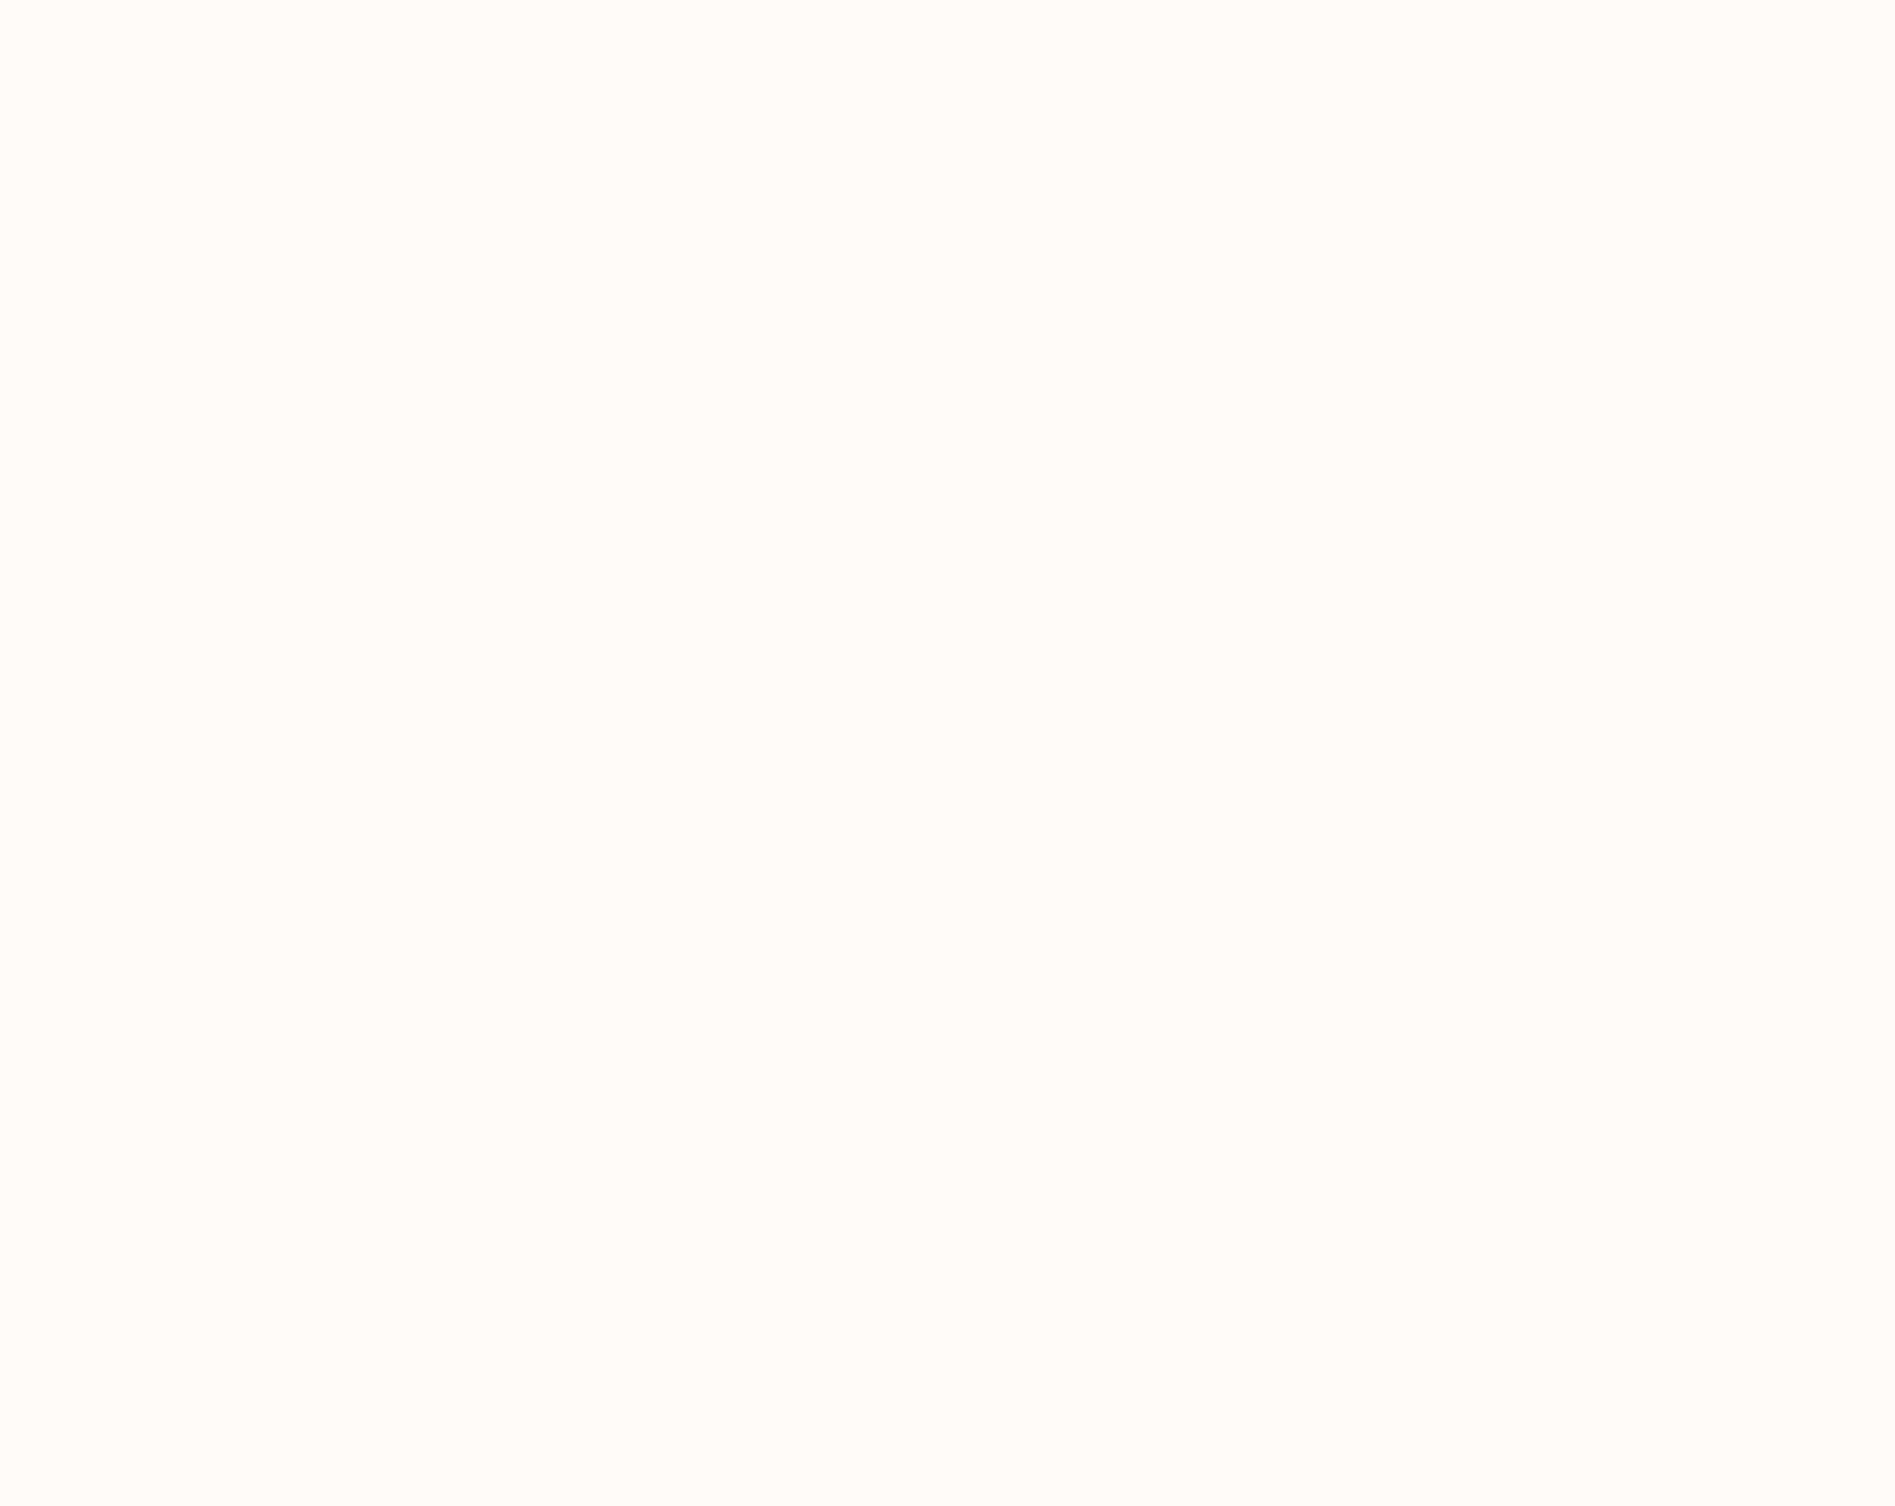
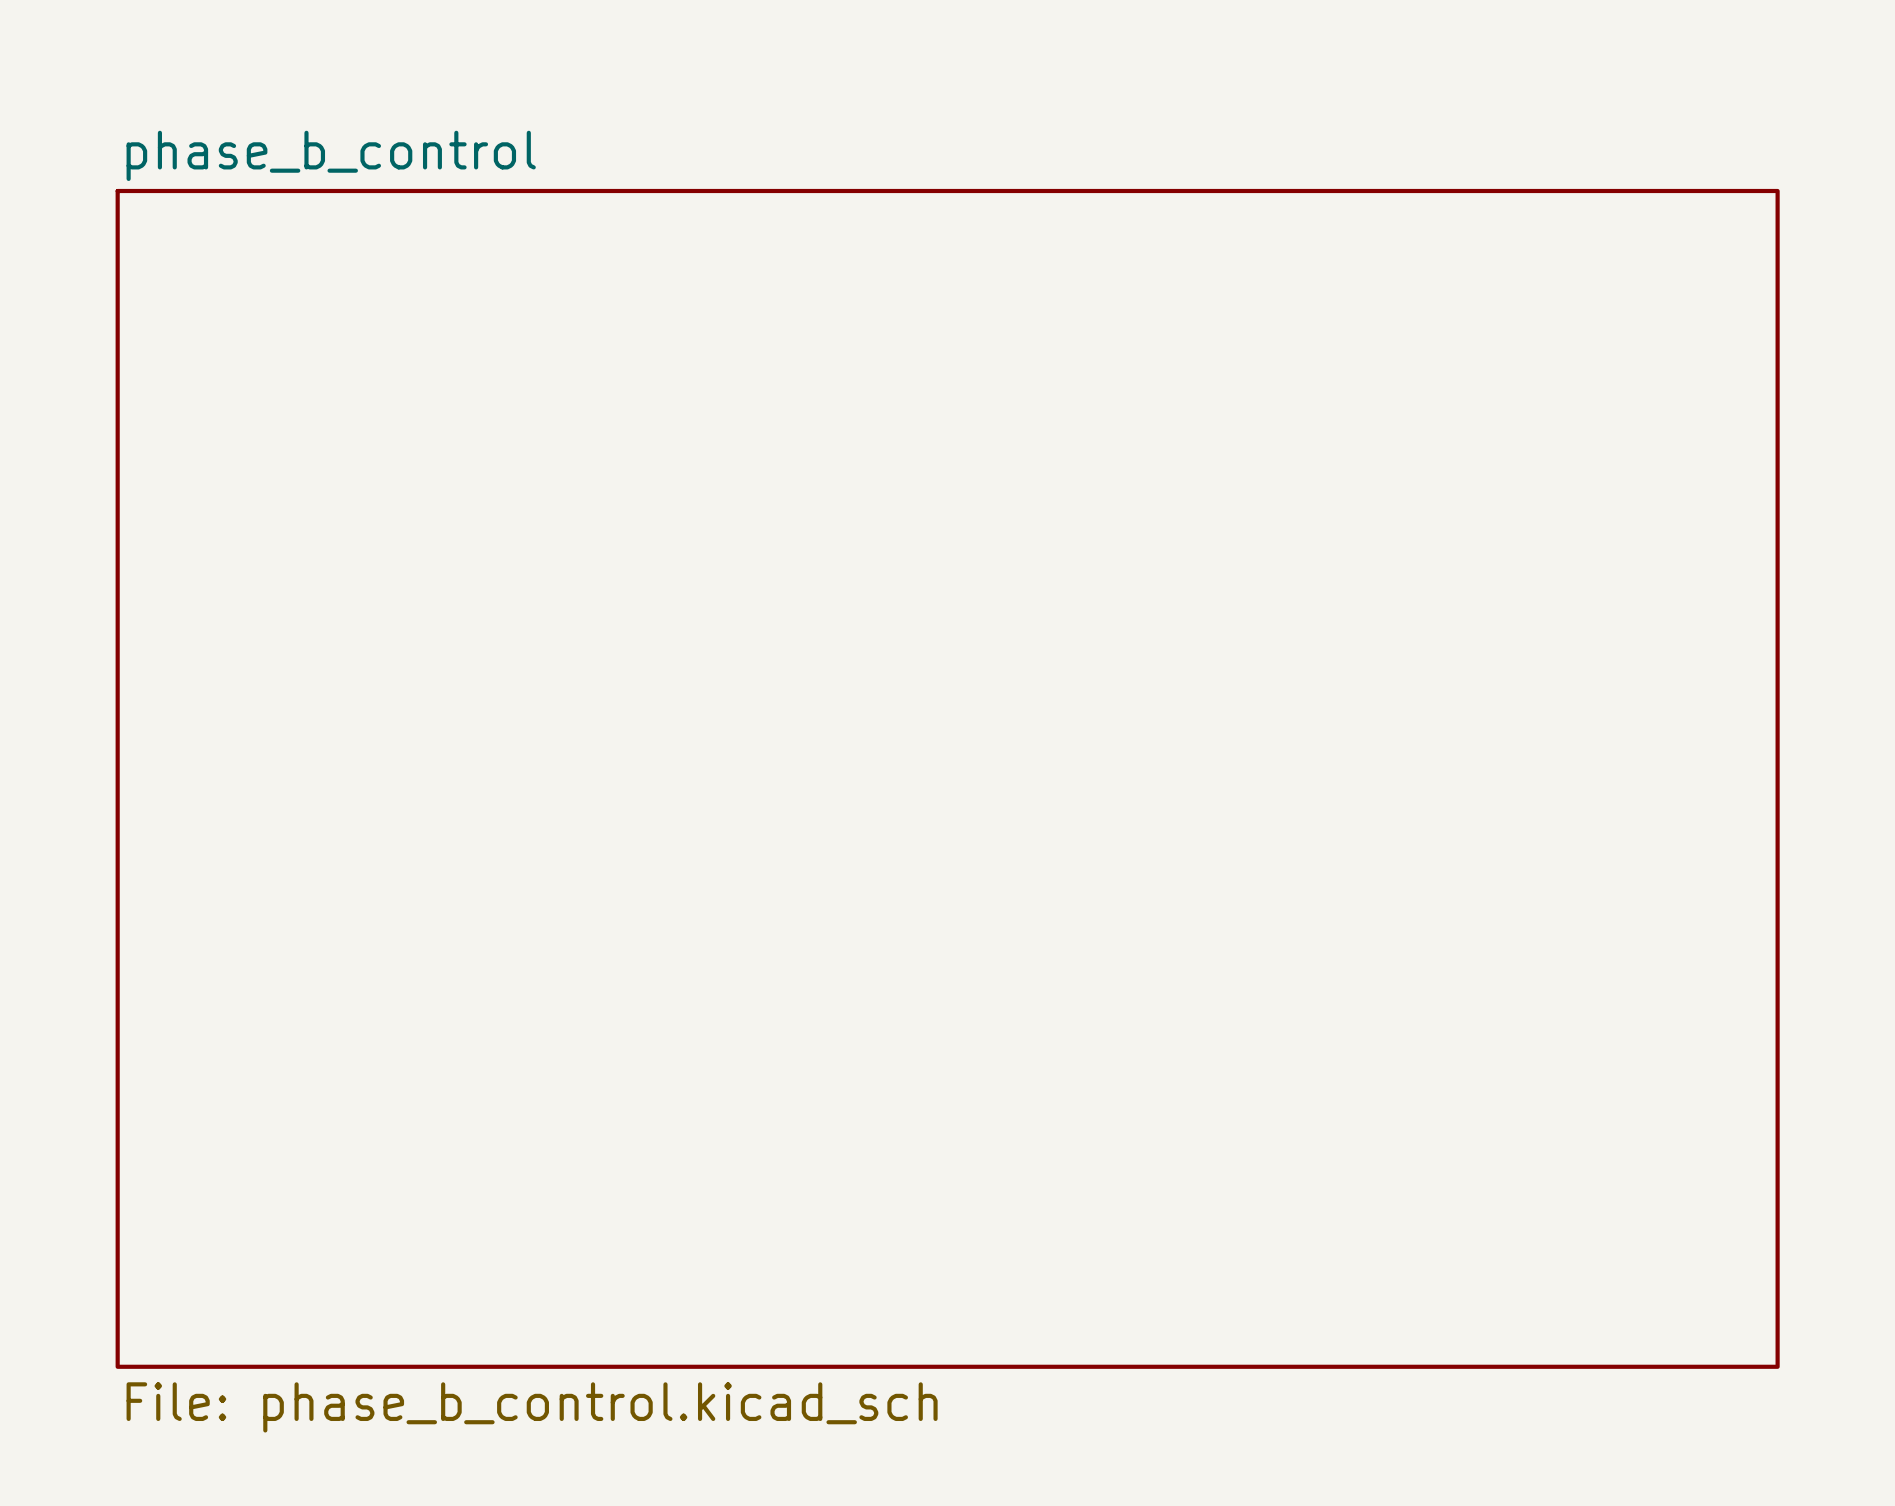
sheet phase_b_control: none -> File: phase_b_control.kicad_sch (947, 778)

